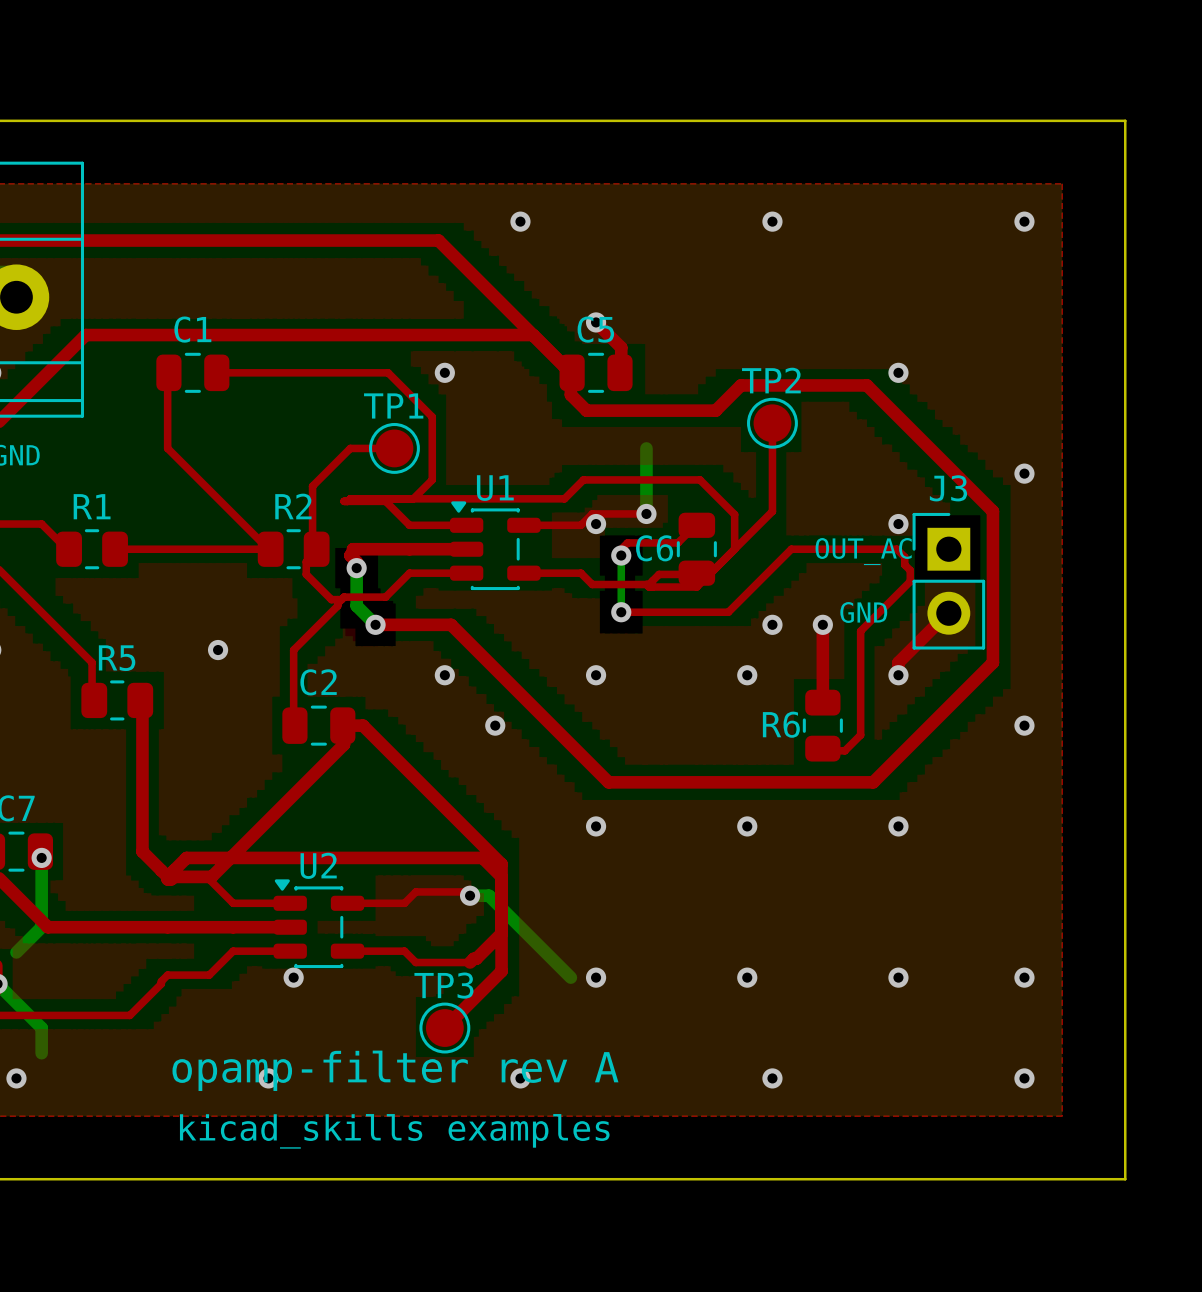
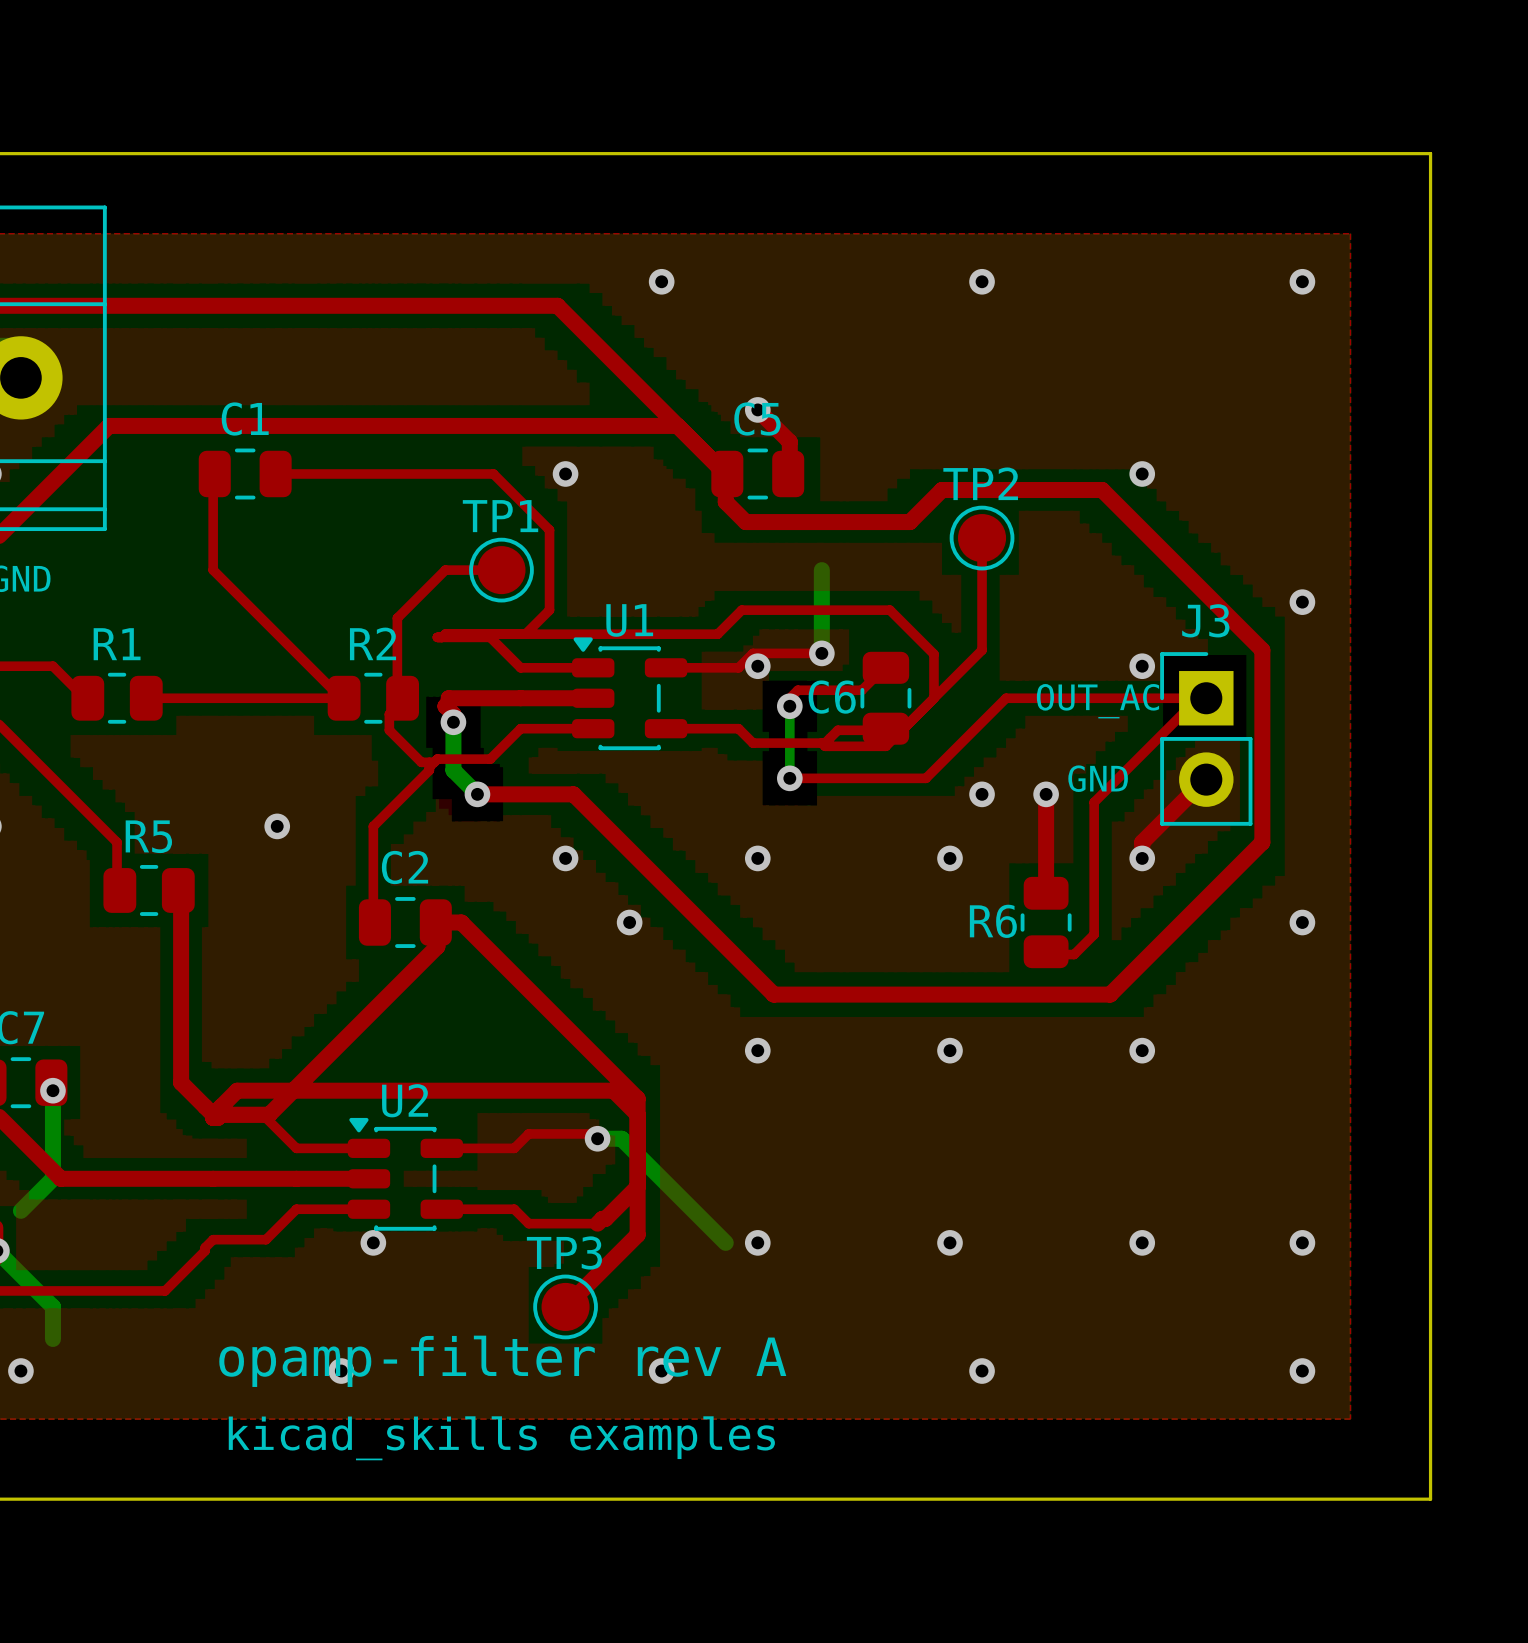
top track: (896, 549) (904, 557) (904, 564) (910, 570) (910, 581) (860, 631) -> (1198, 698) (1094, 802)
top track: none -> (1140, 698) (1206, 698)

